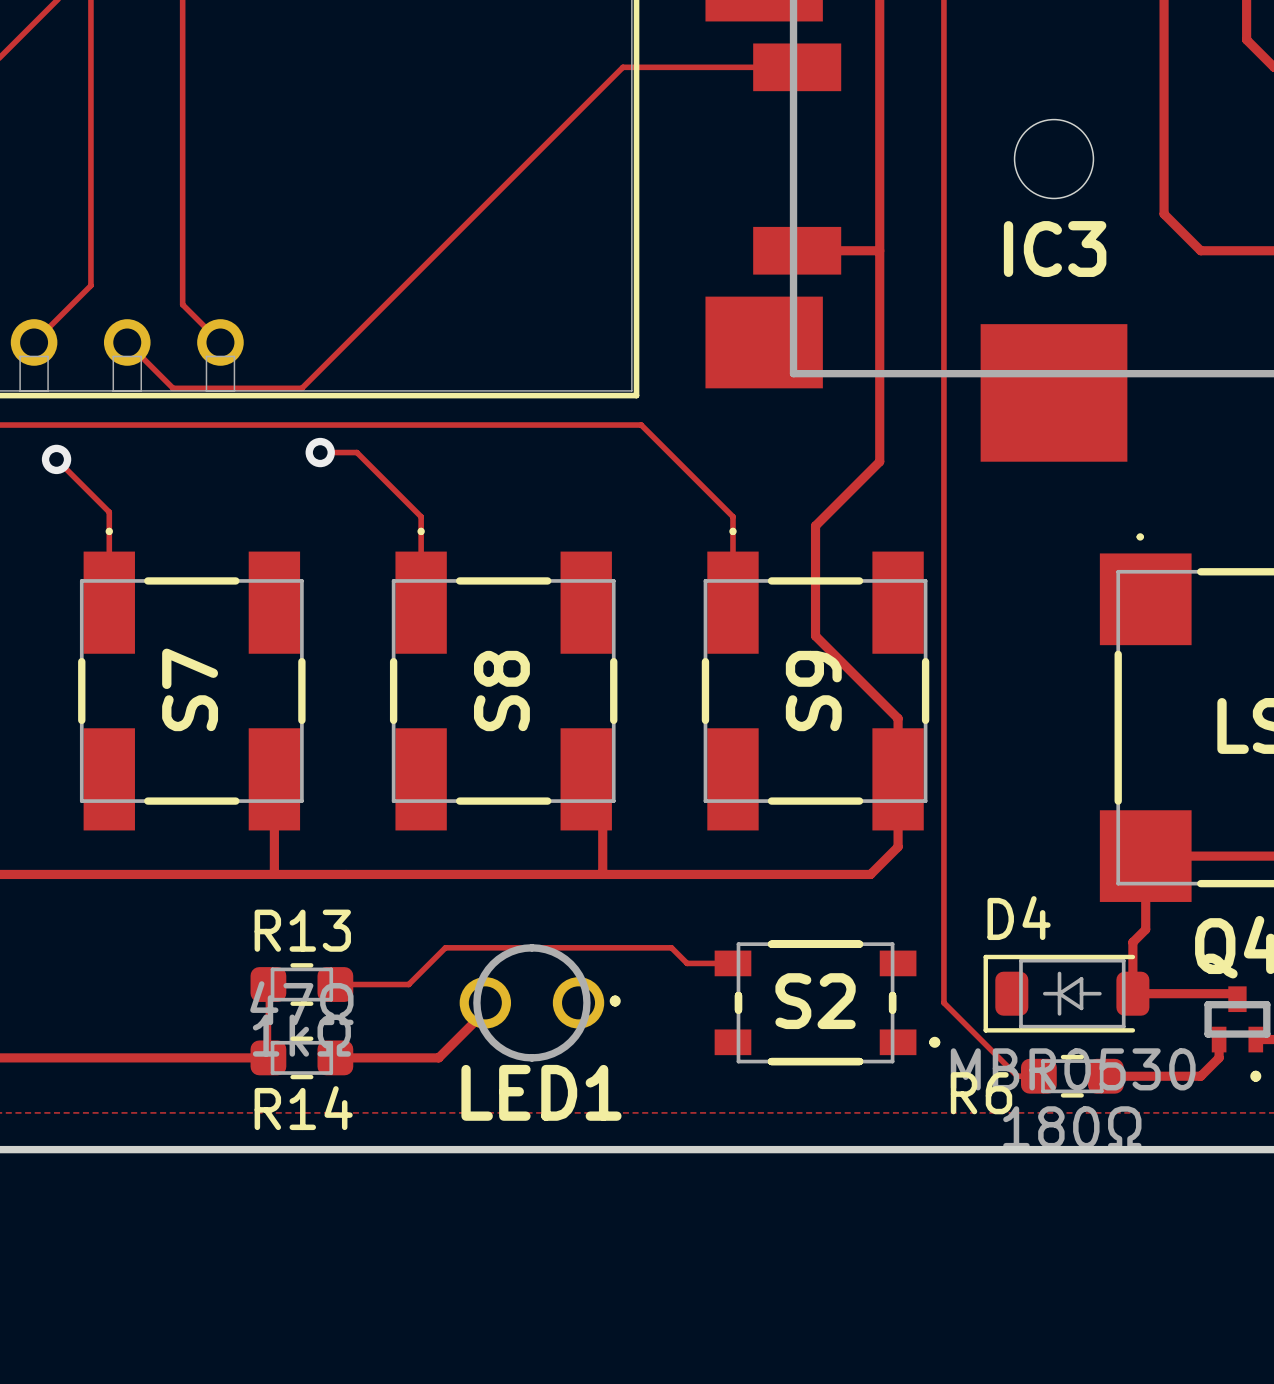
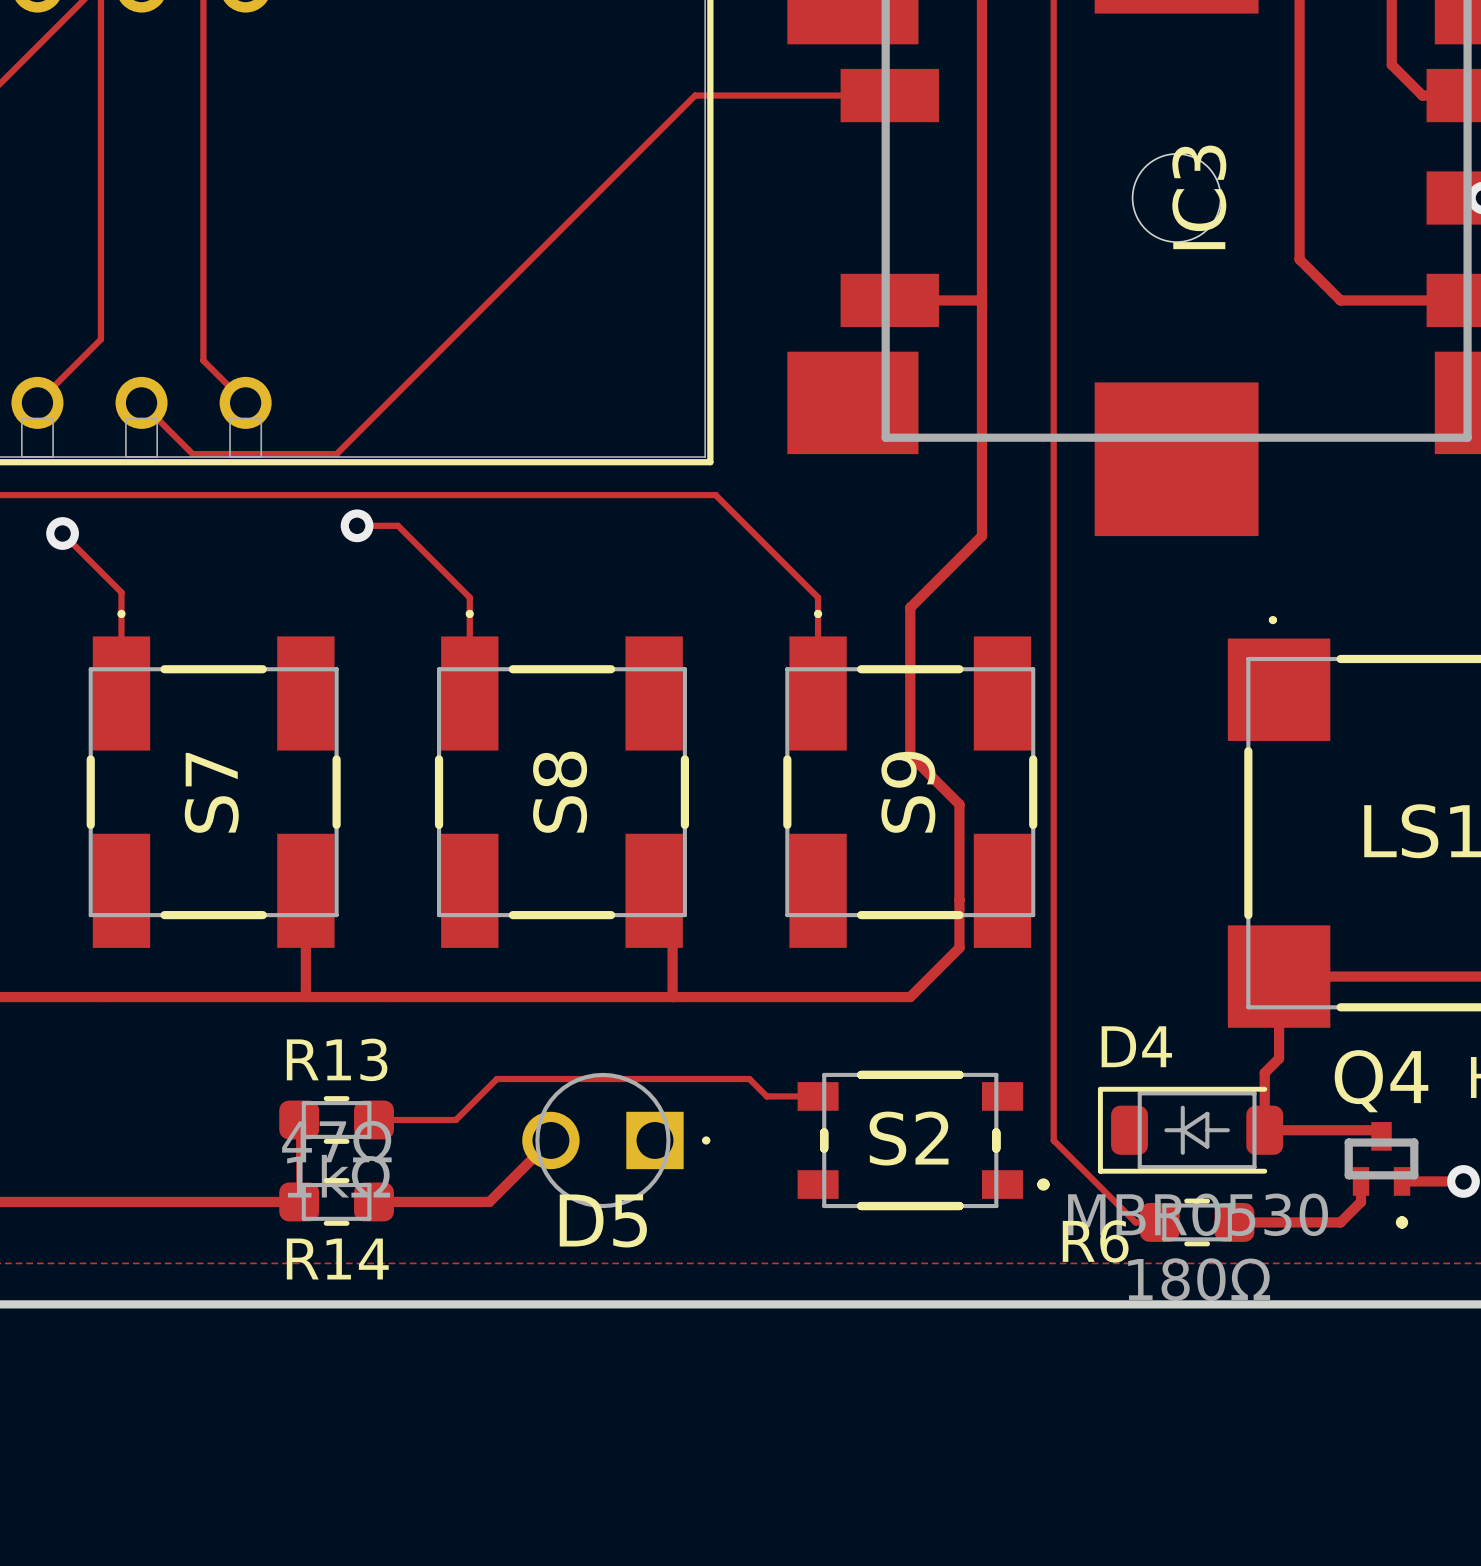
IC3 name rotation: 0° (1055, 249) -> 90° counterclockwise (1199, 197)
track: (815, 635) (898, 718) (898, 846) (870, 874) (815, 874) -> (910, 730) (910, 755) (959, 804) (959, 947) (910, 997)
LED1: (540, 1002) -> none
D5: none -> (616, 1140)

